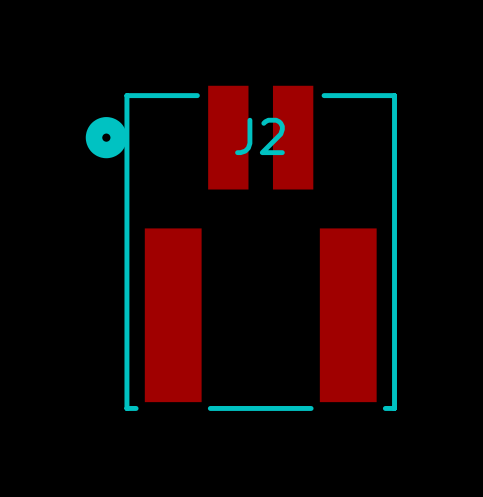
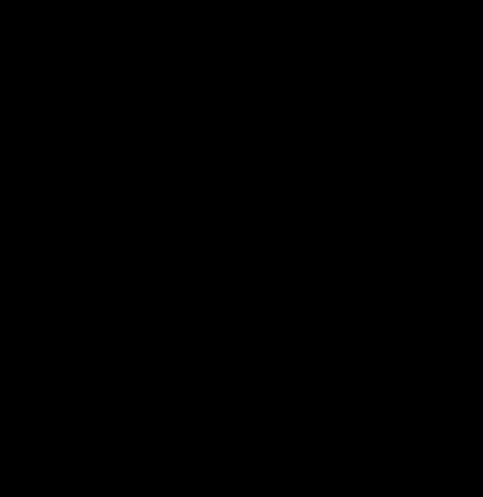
J2: (241, 248) -> none

